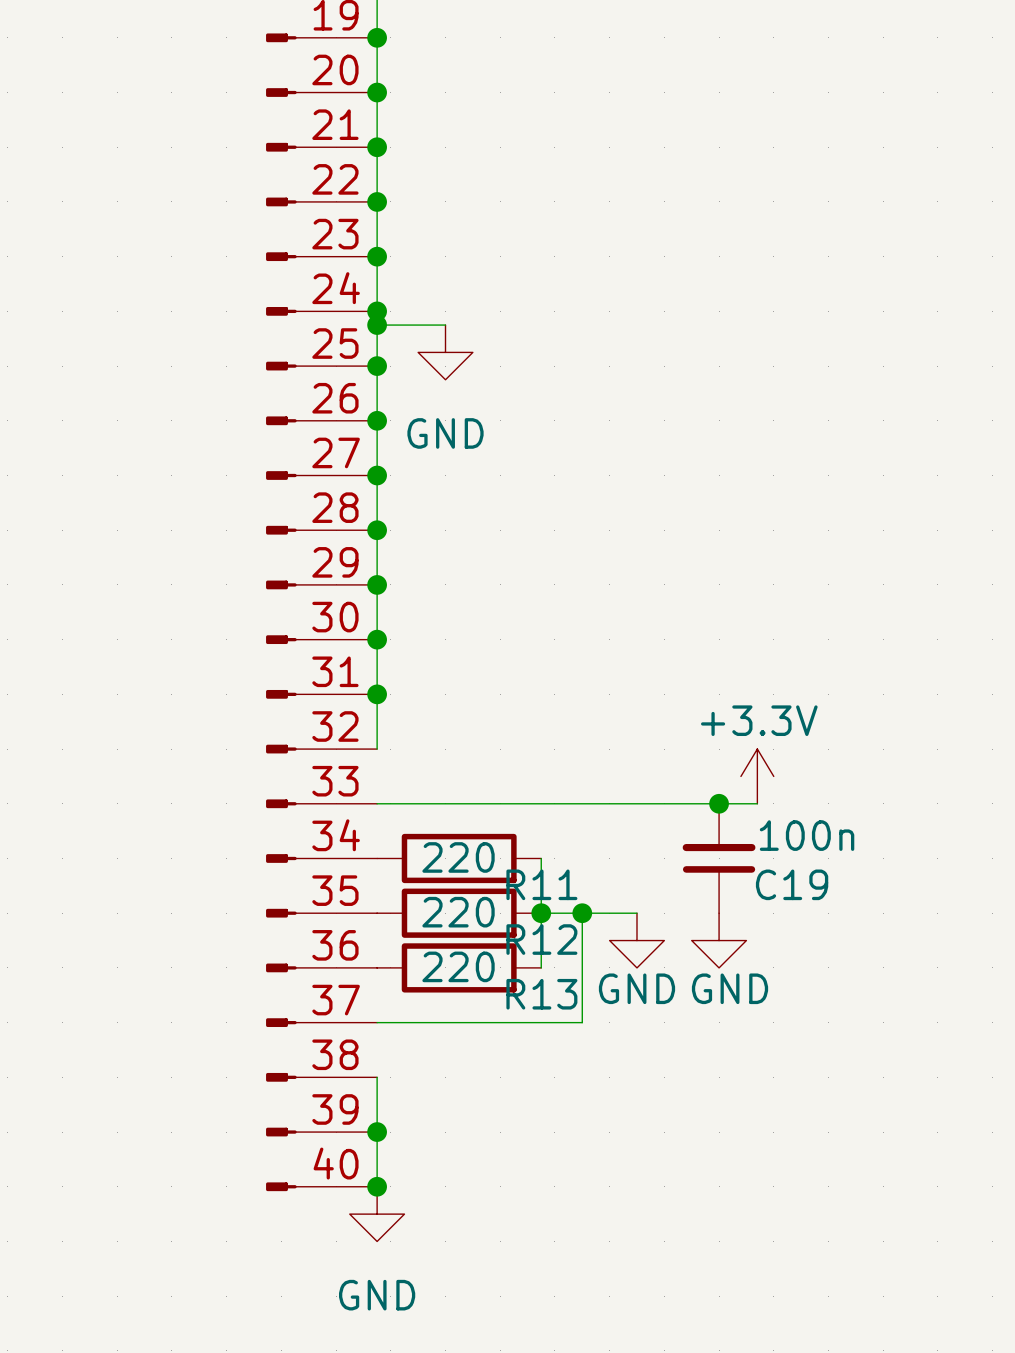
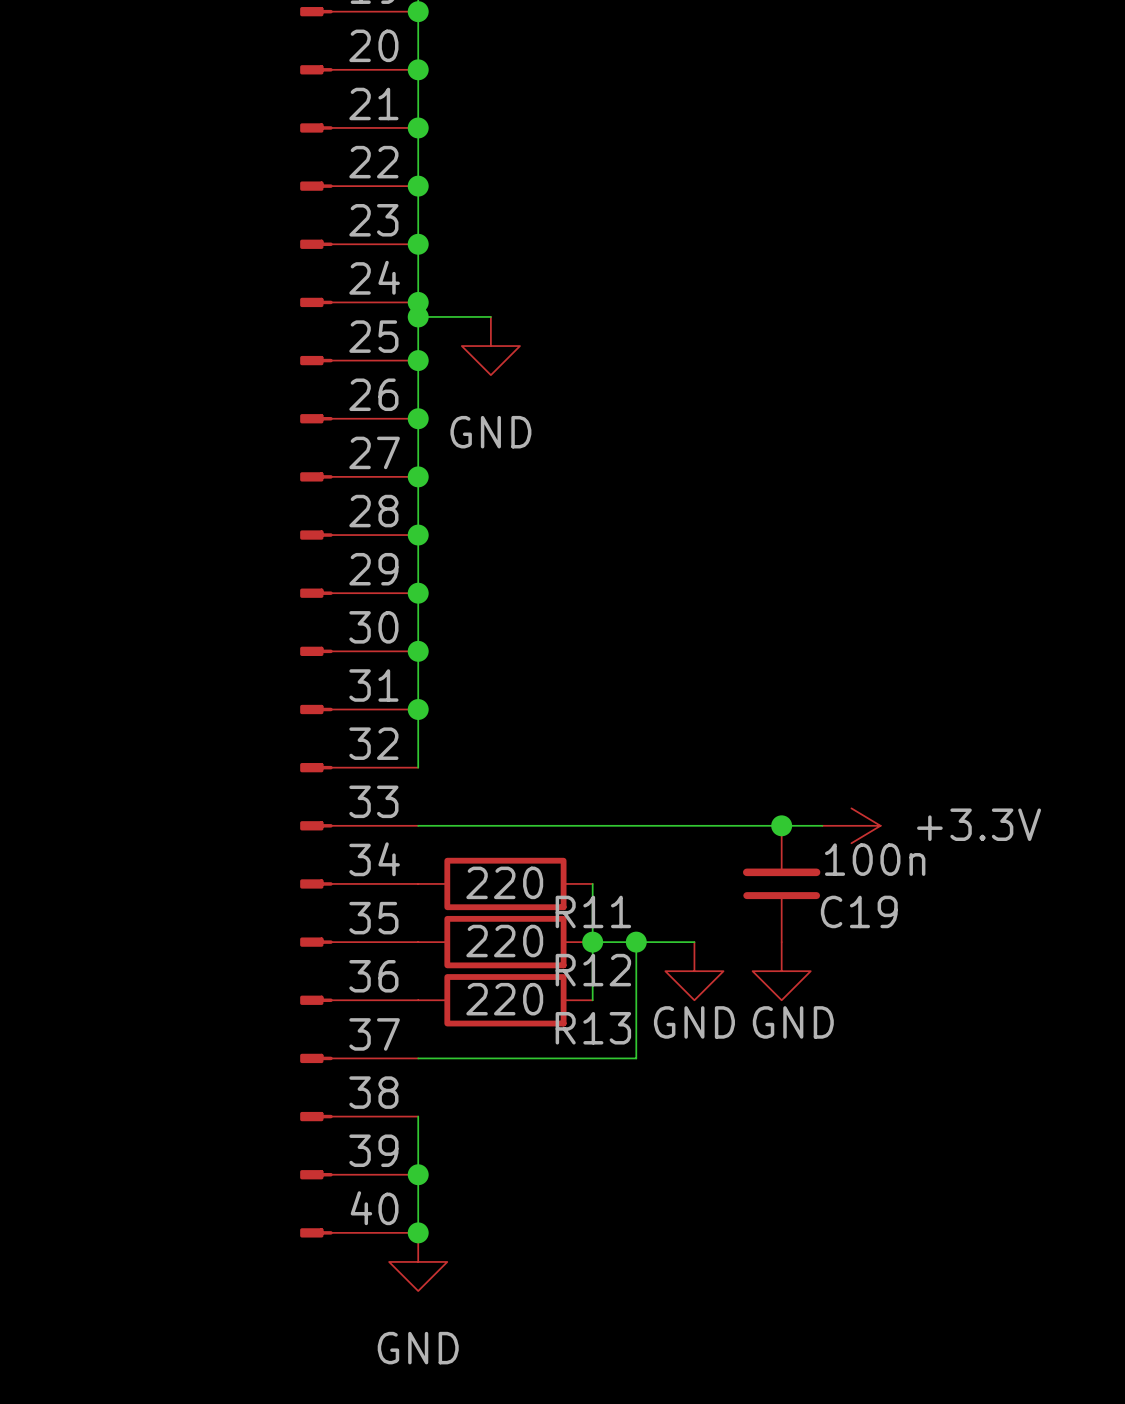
power symbol text position: +3.3V (759, 720) -> +3.3V (979, 824)
power symbol rotation: 0° (757, 776) -> 90° clockwise (851, 825)
power symbol position: +3.3V (757, 776) -> +3.3V (851, 825)

